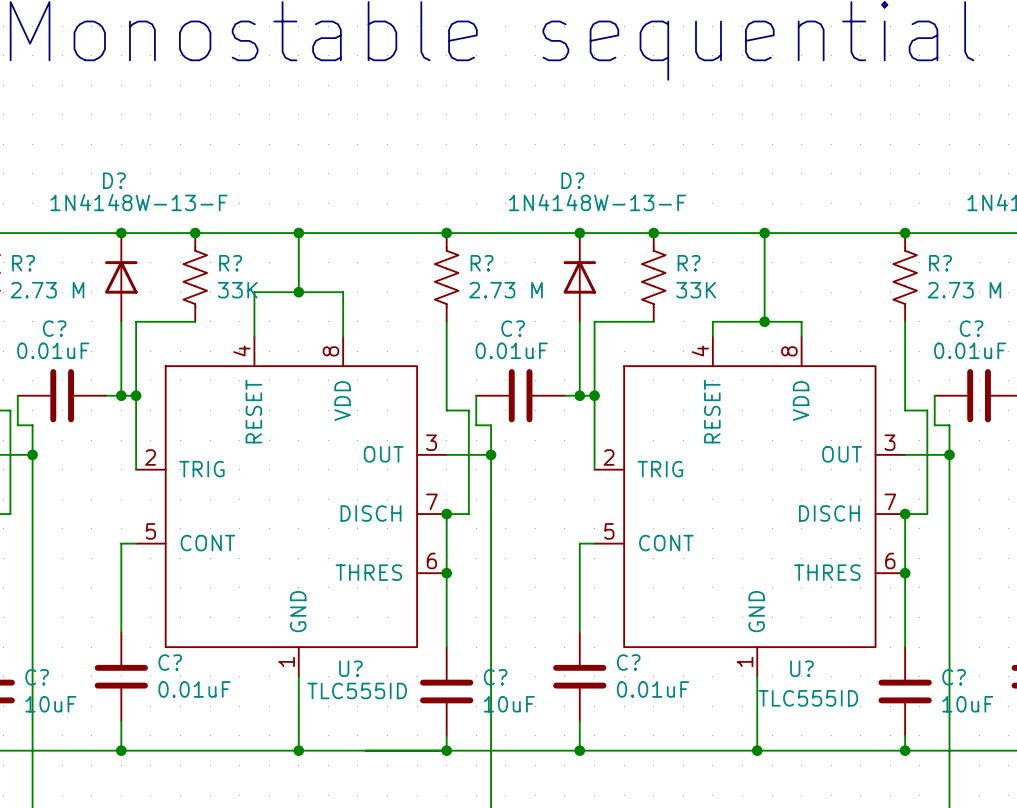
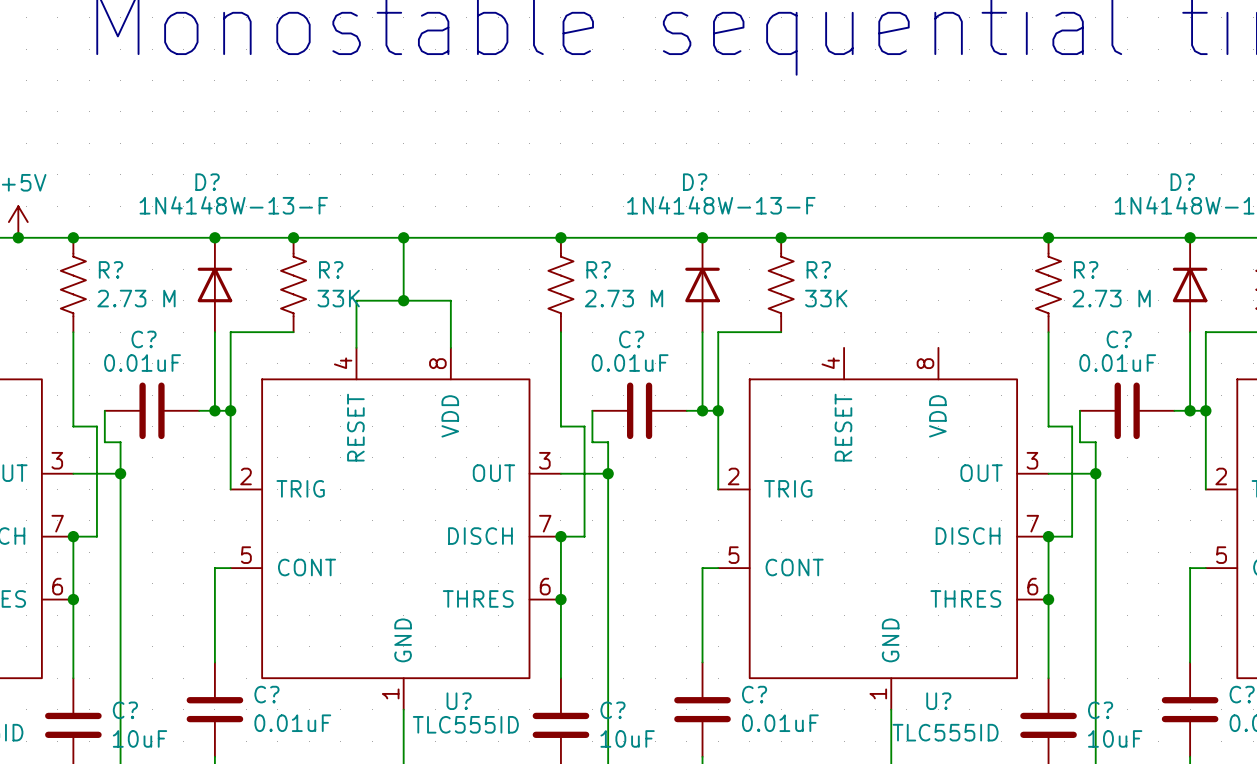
wire: (764, 233) (764, 321) -> none
junction: (764, 233) -> none
junction: (764, 321) -> none
wire: (712, 336) (712, 321) (801, 321) (801, 336) -> none

